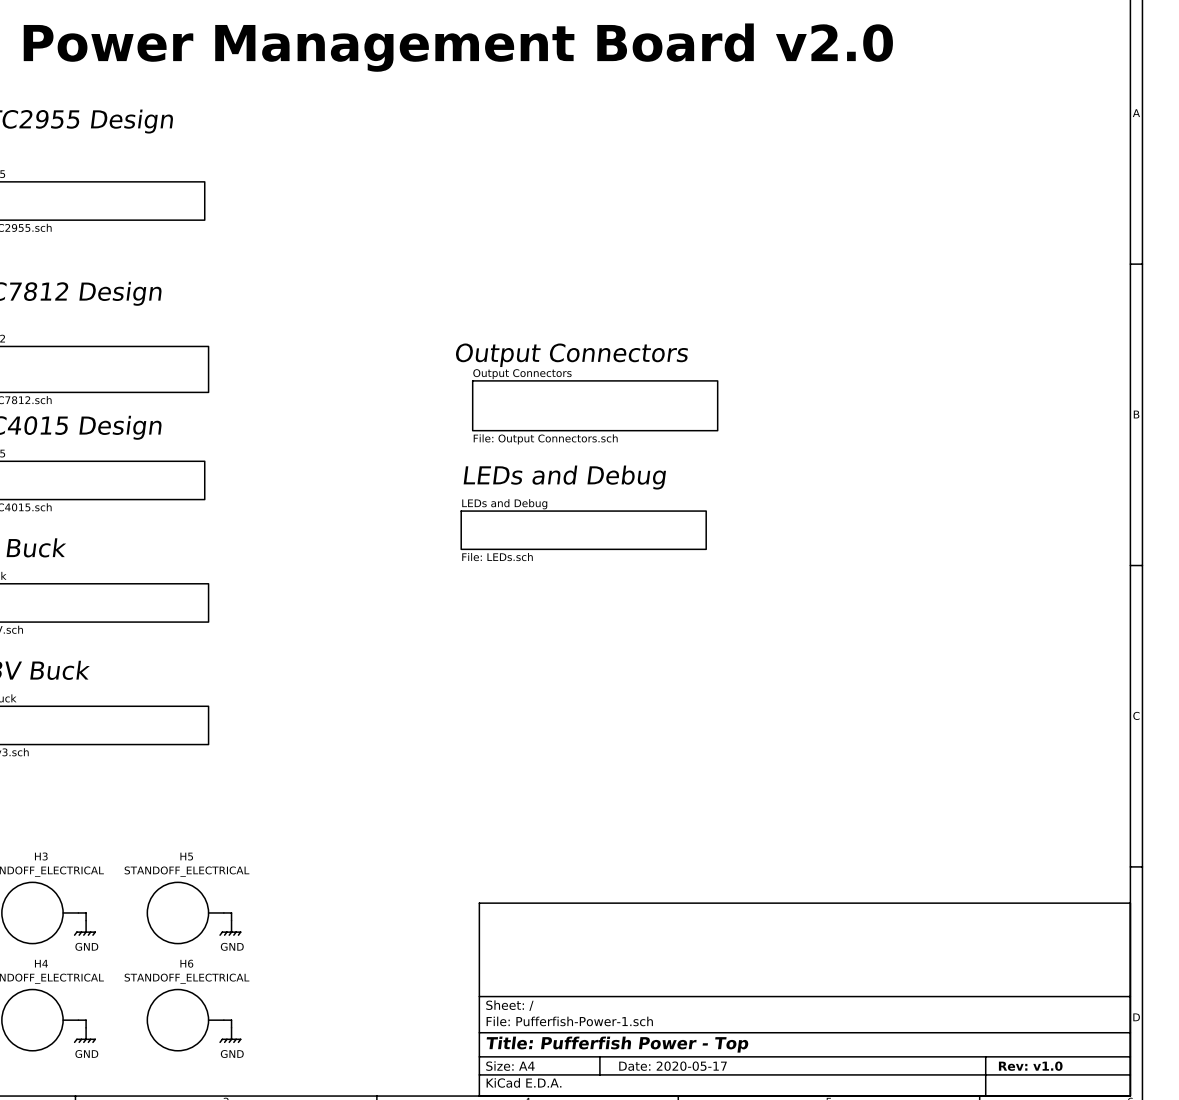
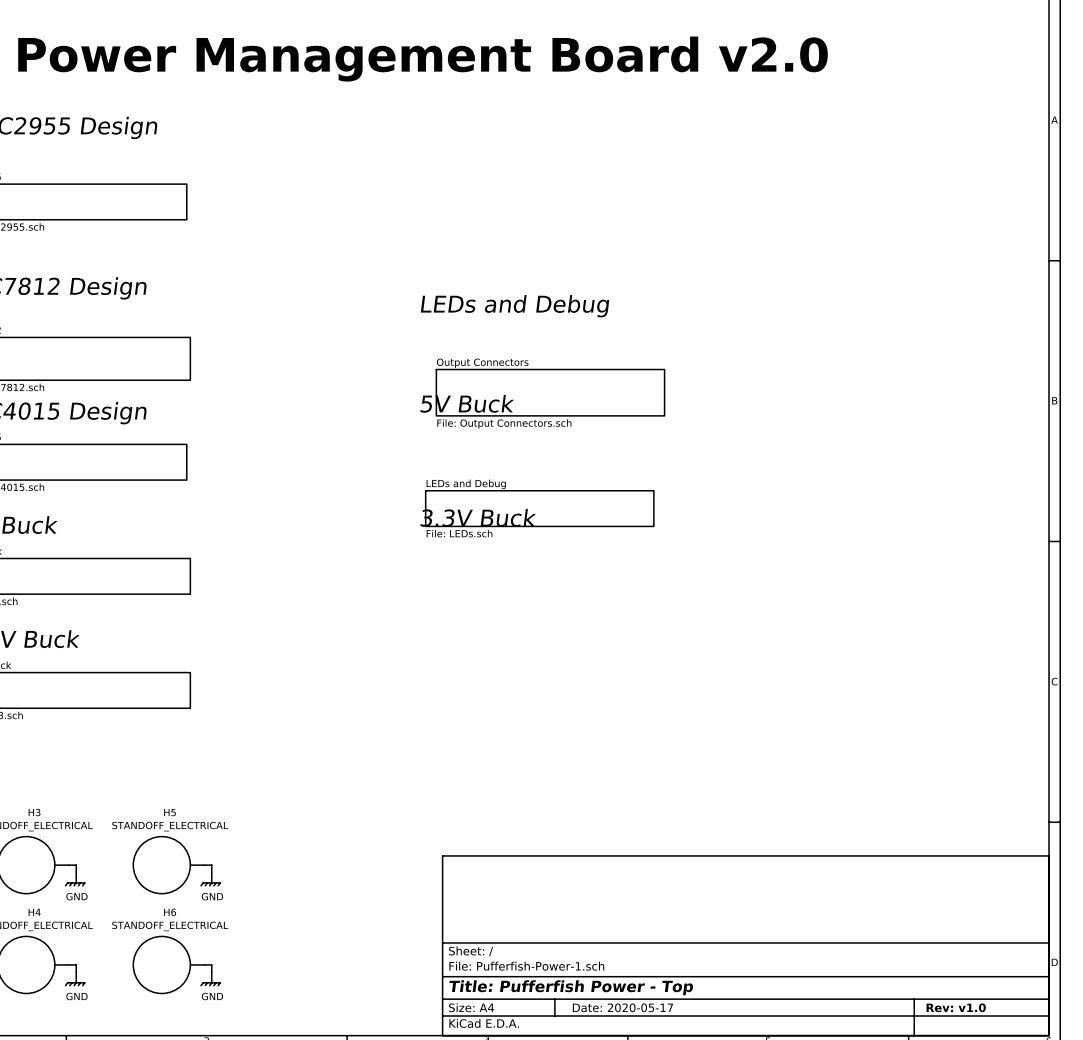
text: none -> LEDs and Debug (515, 306)
text: Output Connectors (571, 355) -> none
text: none -> 5V Buck (467, 403)
text: LEDs and Debug (564, 477) -> none
text: none -> 3.3V Buck (478, 517)

